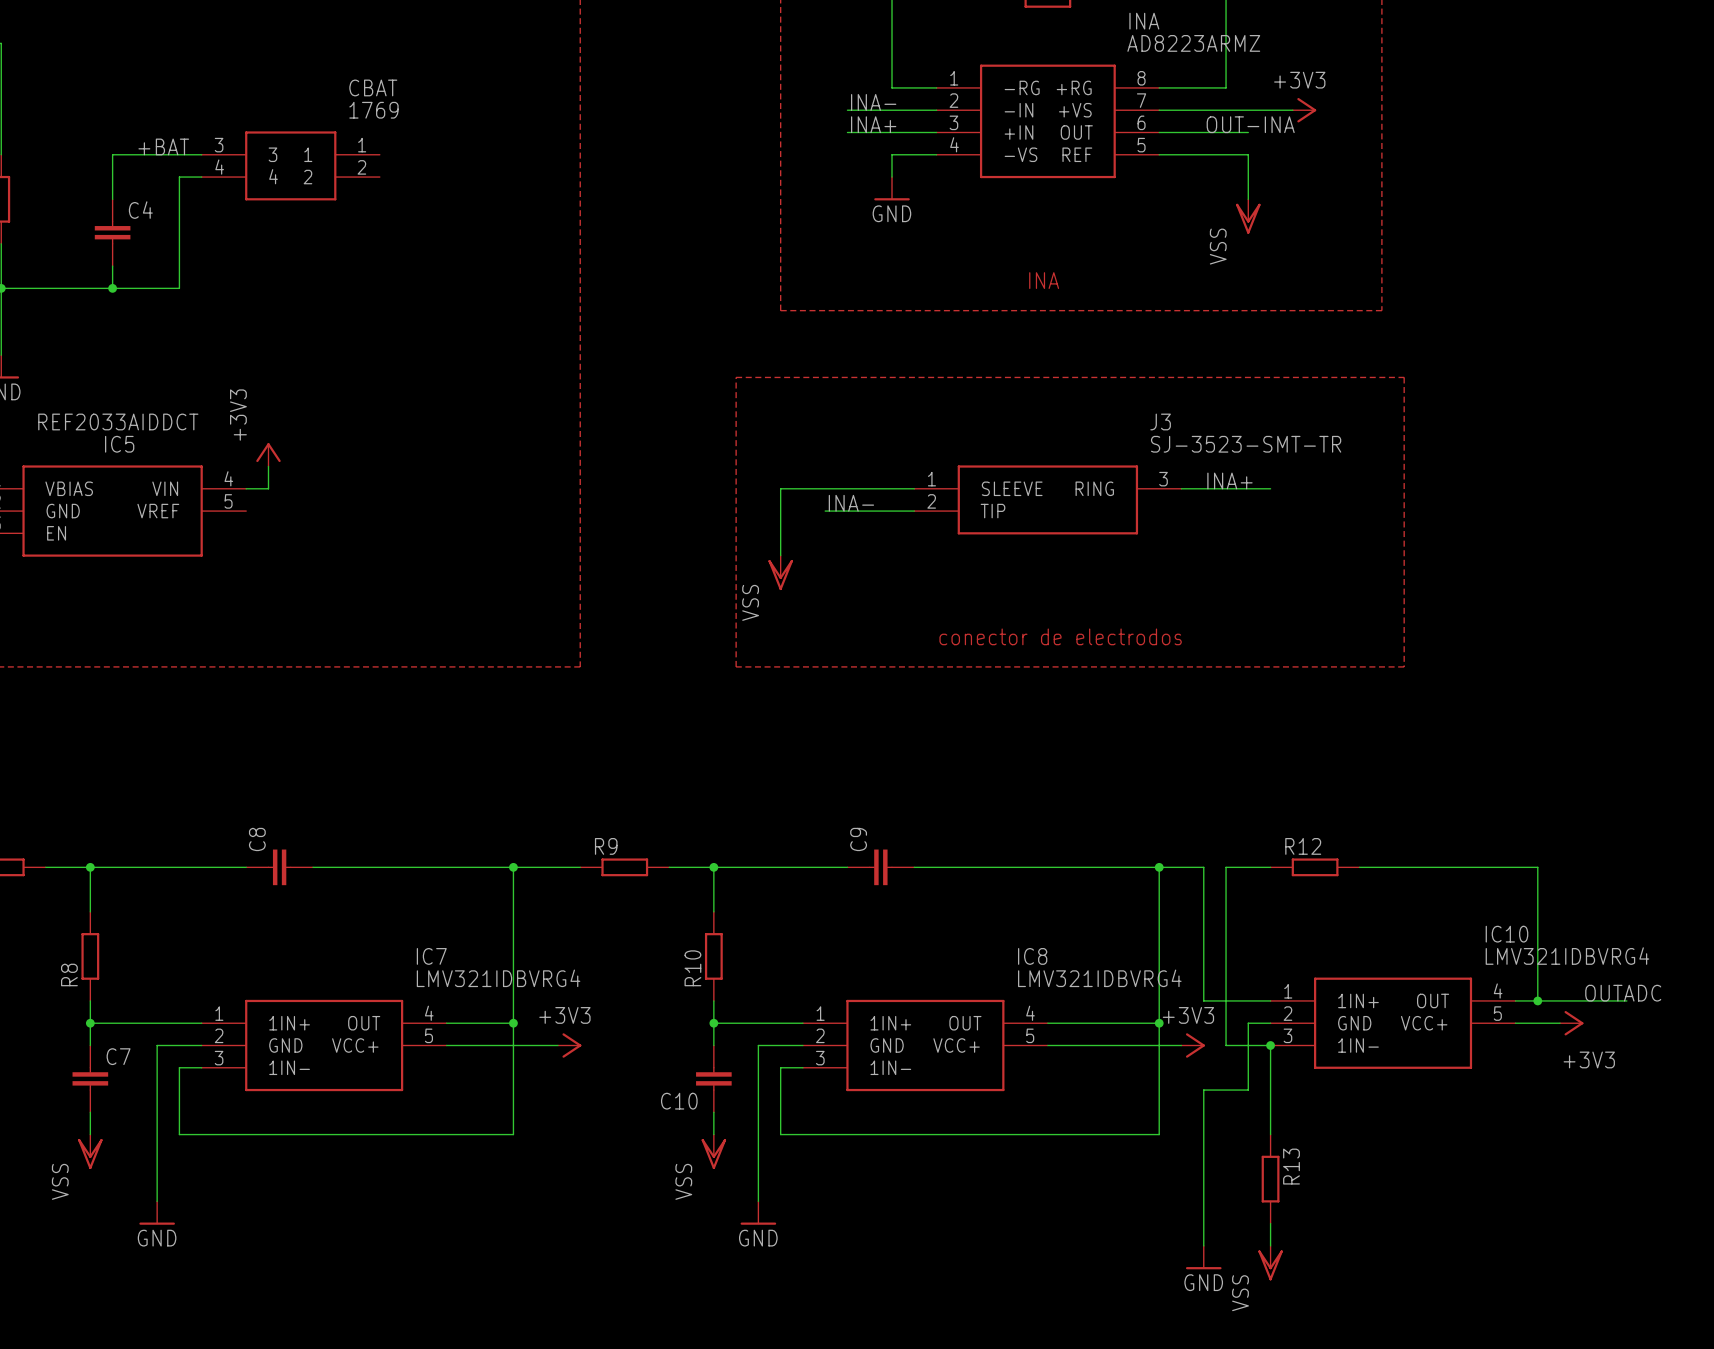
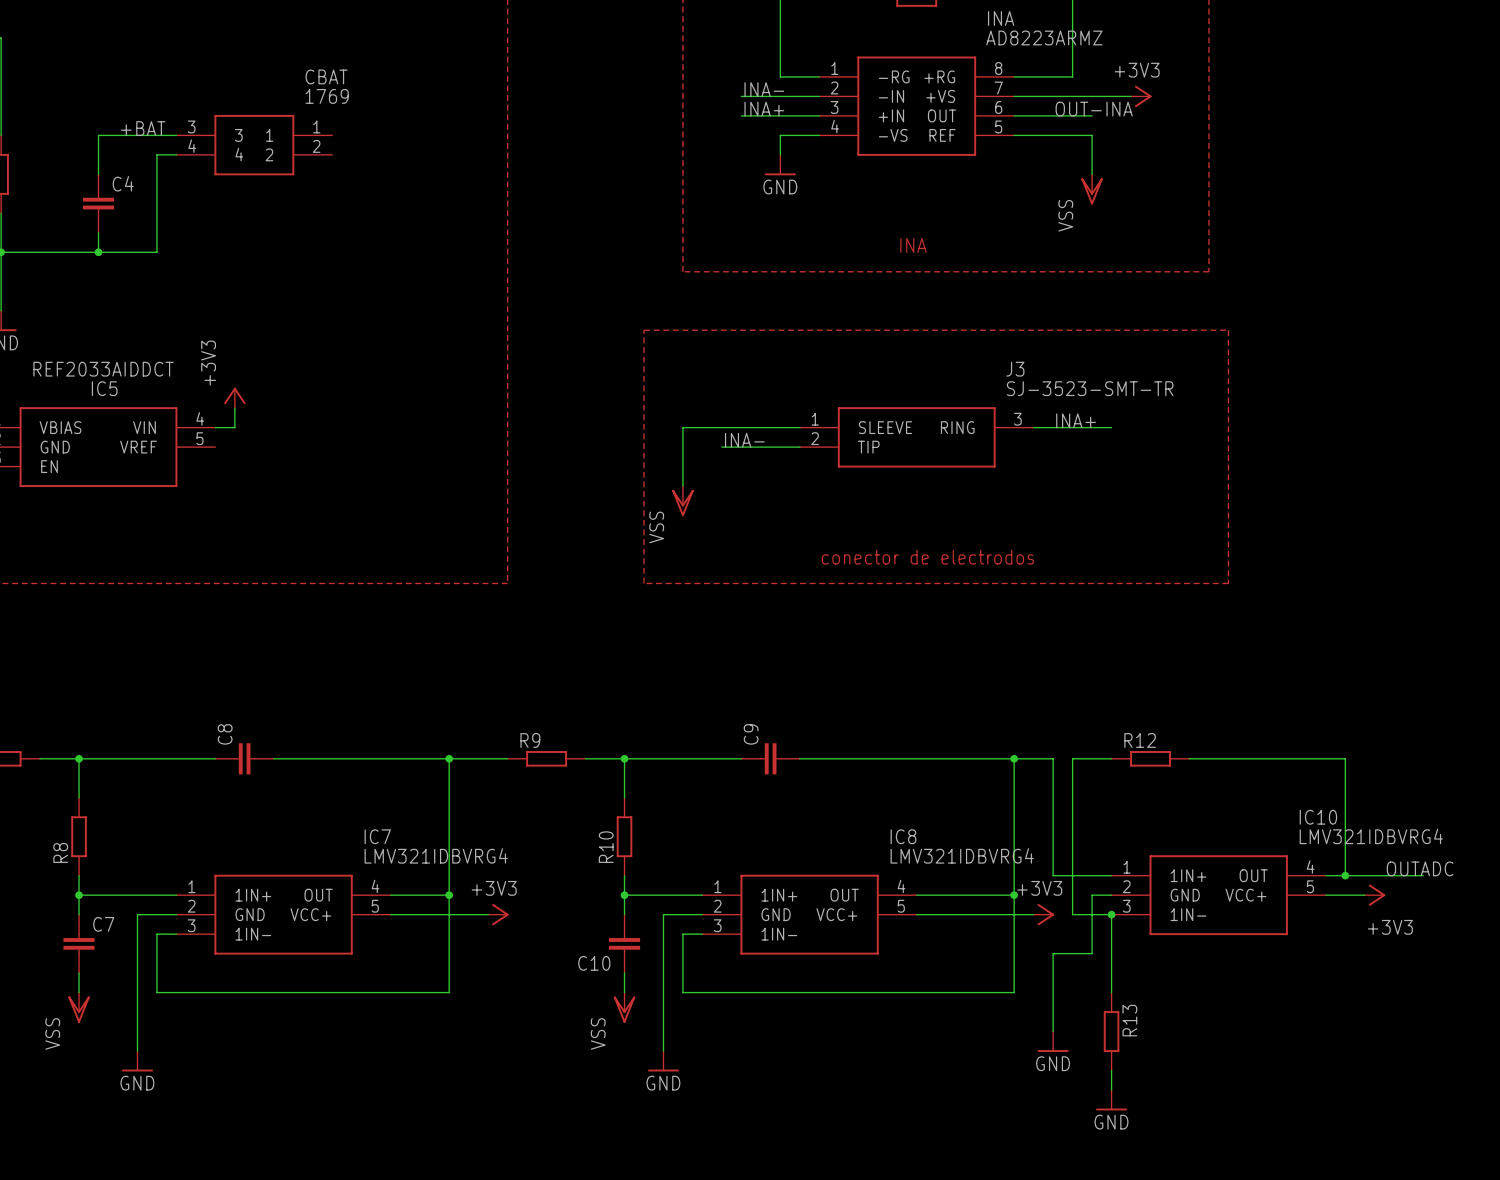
wire: (1203, 1179) (1203, 1245) -> none
power symbol position: GND (1203, 1257) -> GND (1053, 1041)
power symbol: VSS (1270, 1263) -> GND (1111, 1100)

